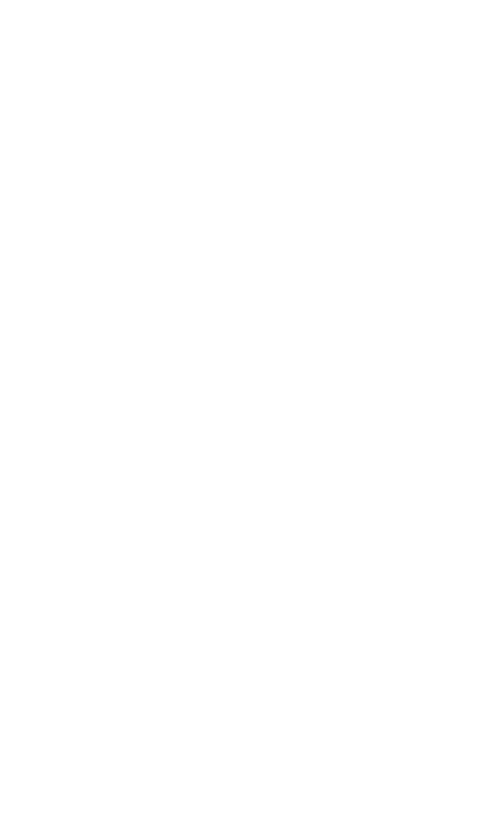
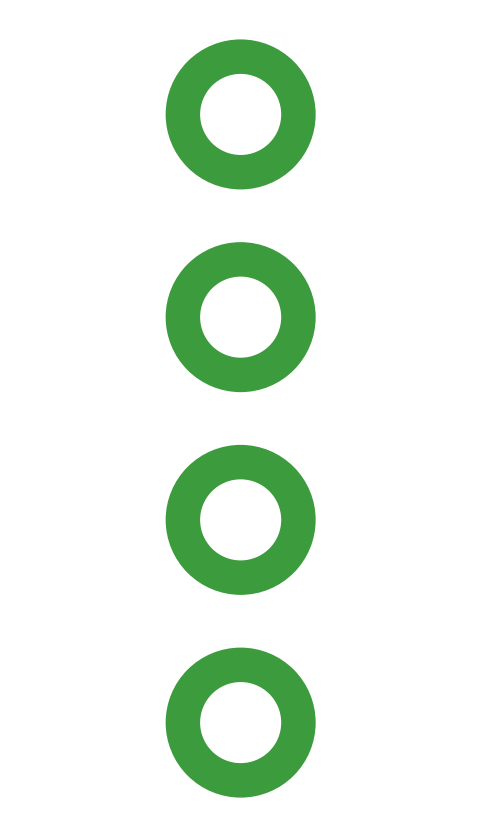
part: none -> (240, 418)

